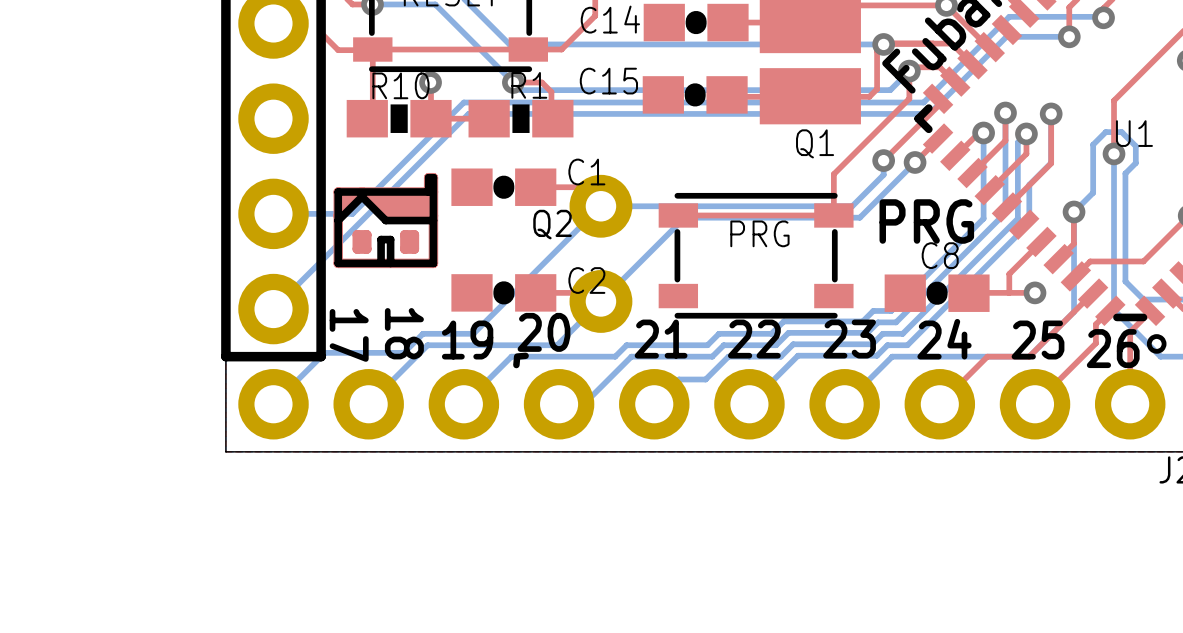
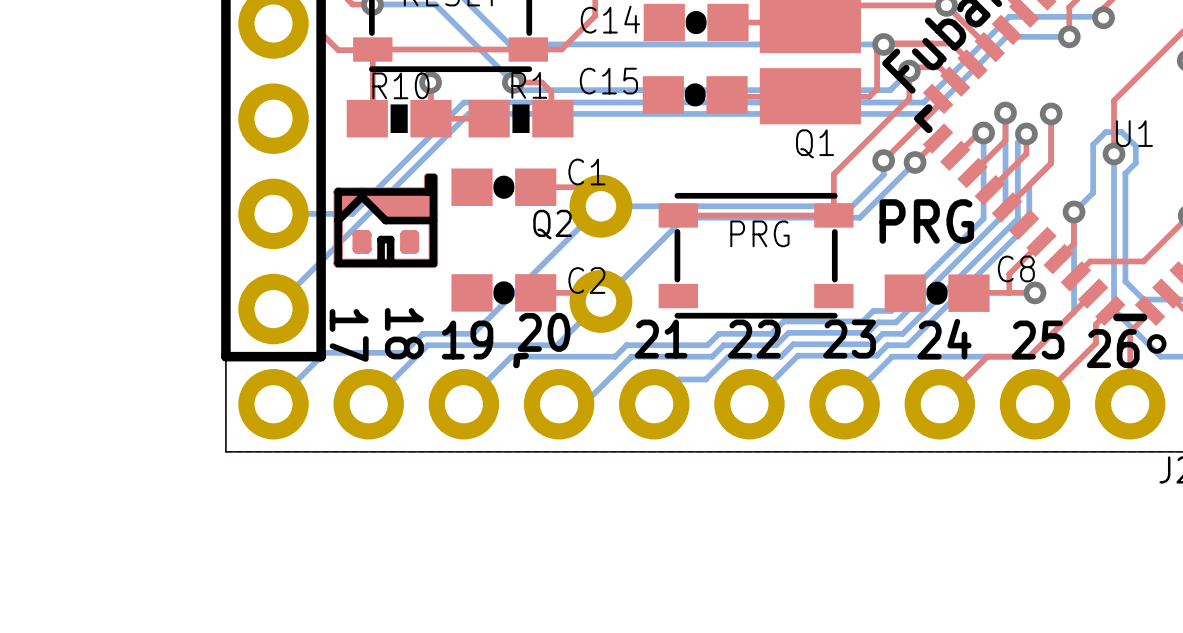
C8 name position: C8 (940, 255) -> C8 (1016, 268)

